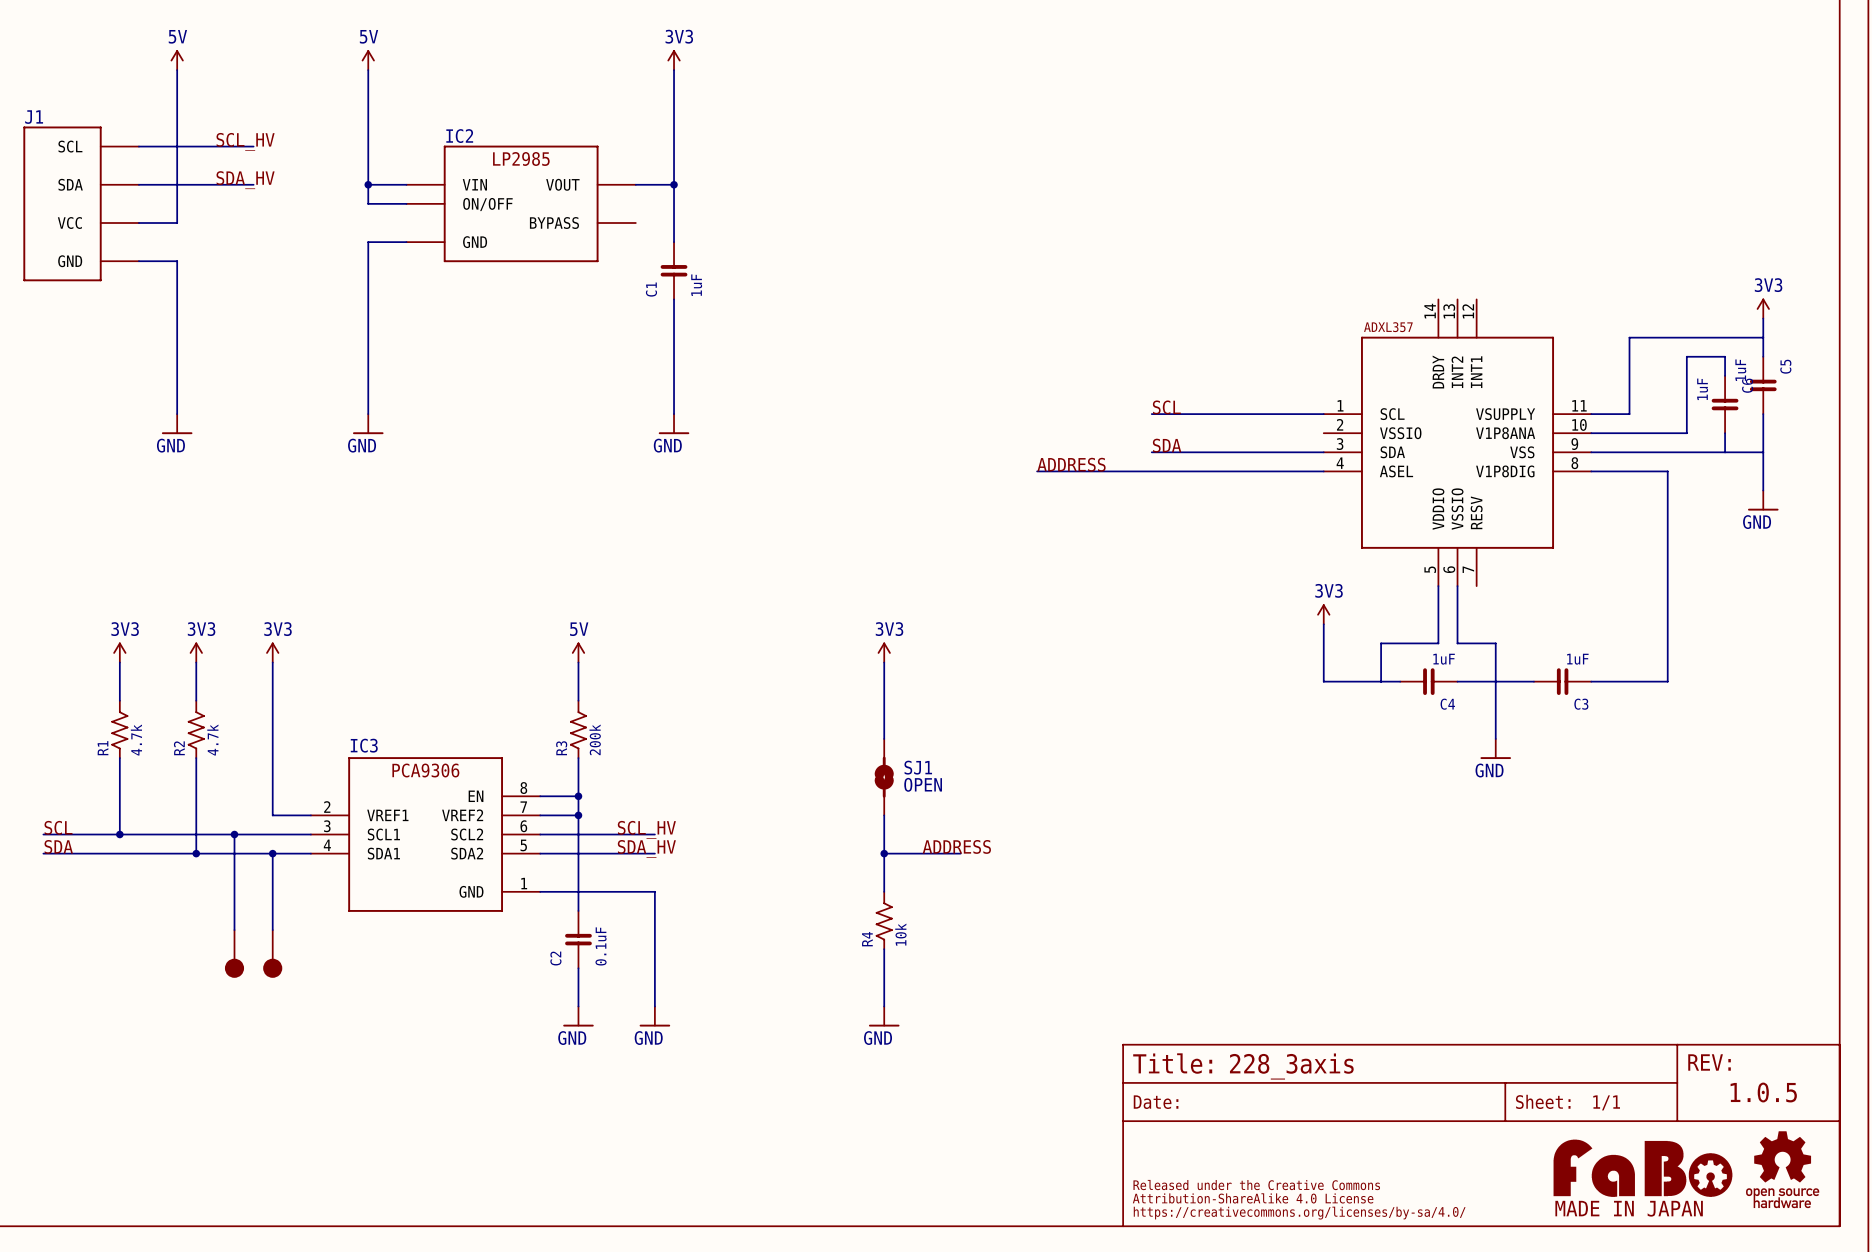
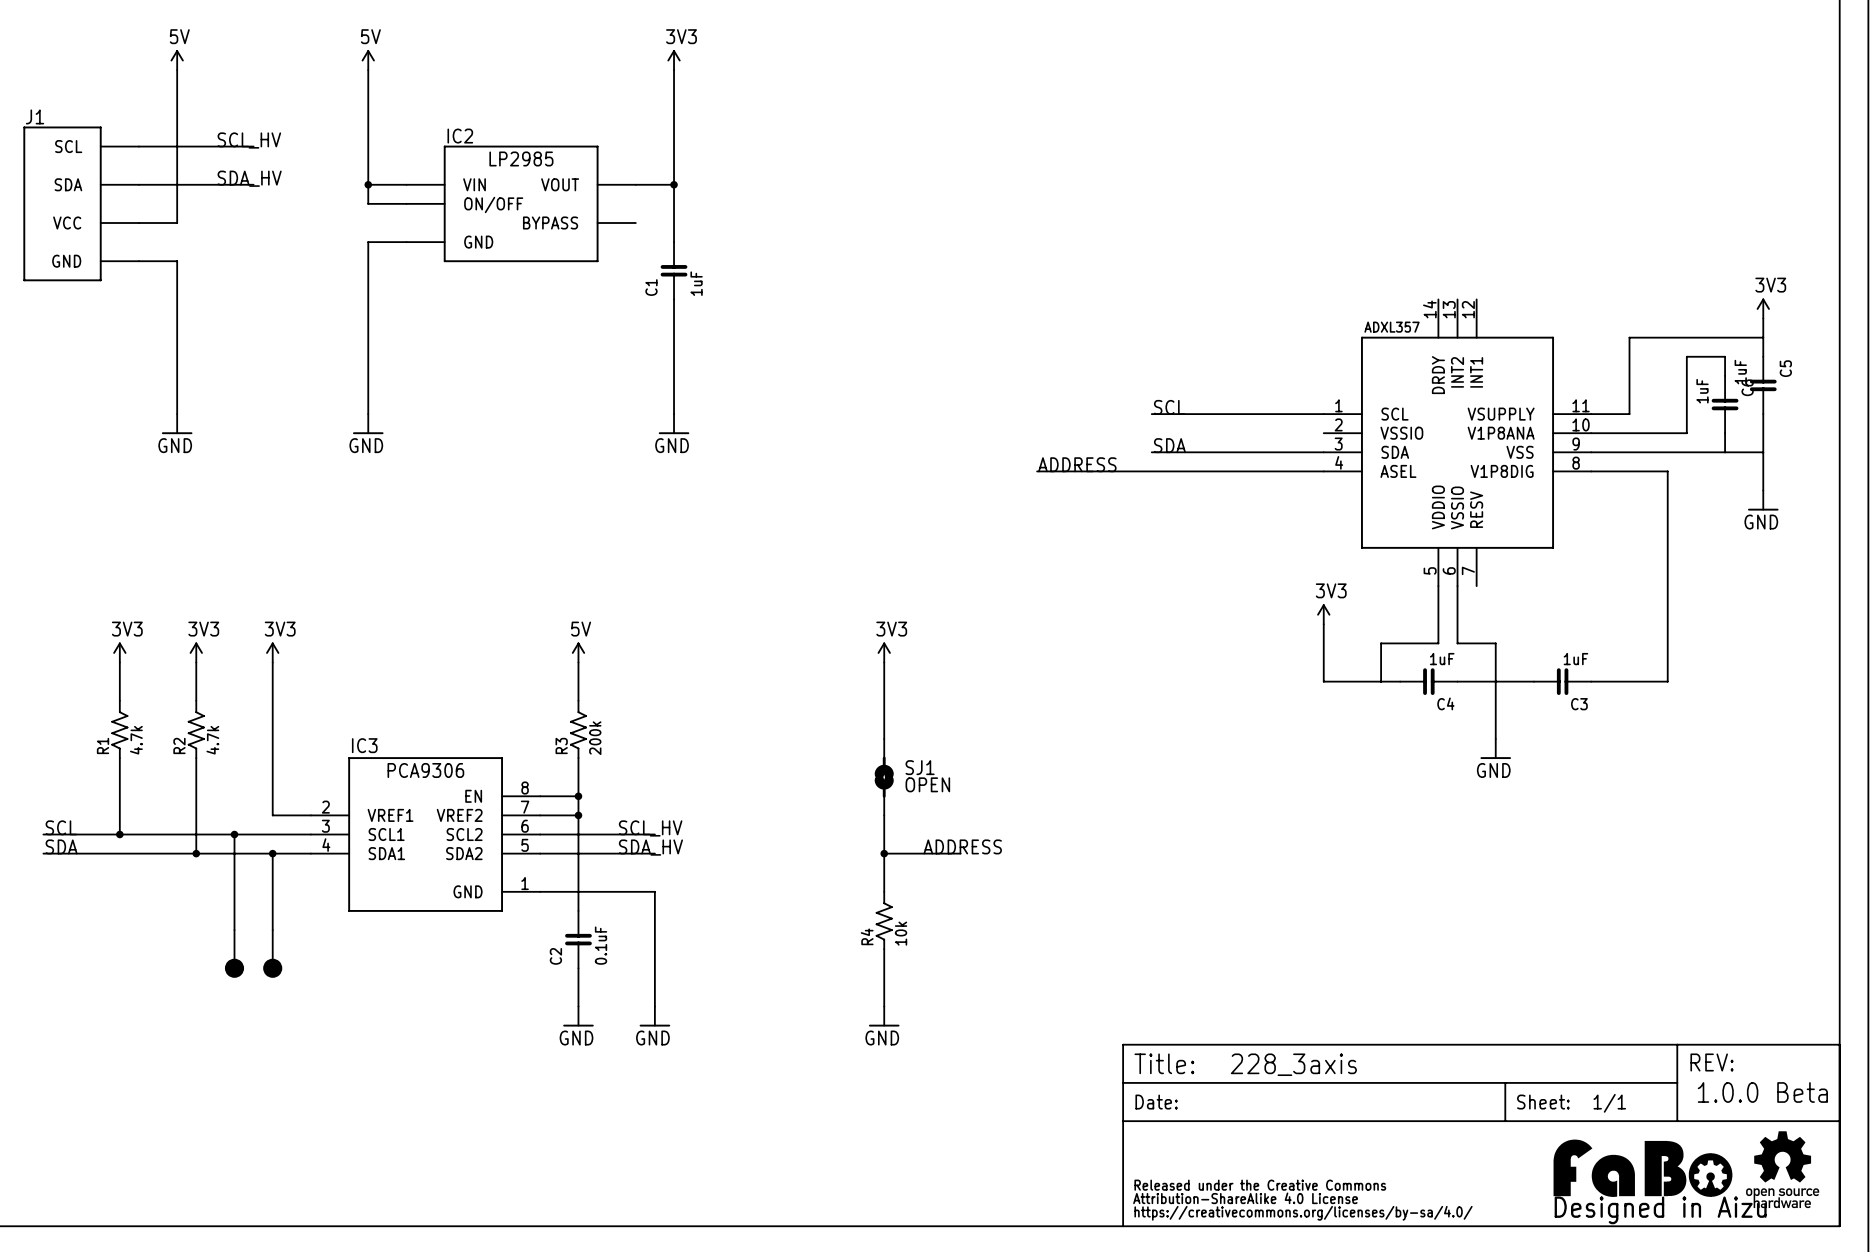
text: 1.0.5 (1763, 1092) -> 1.0.0 Beta (1762, 1092)
part text: MADE IN JAPAN (1629, 1208) -> none
part text: none -> Designed in Aizu (1660, 1210)

